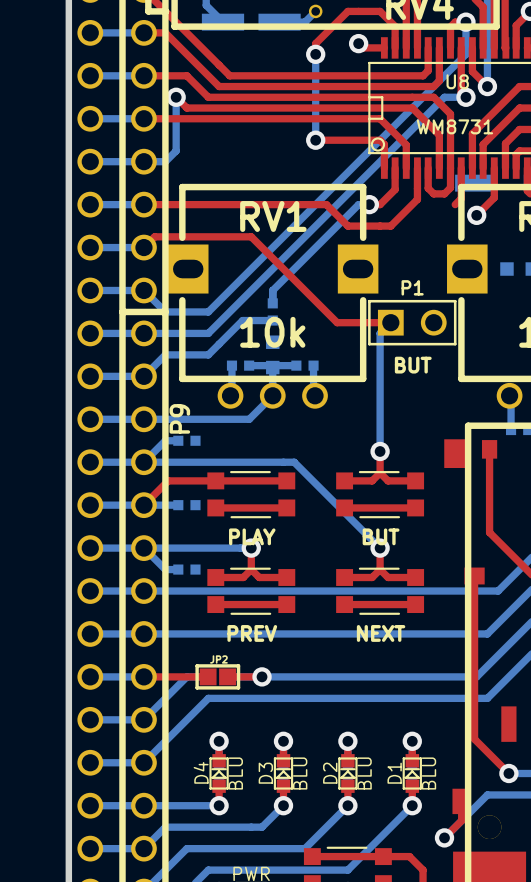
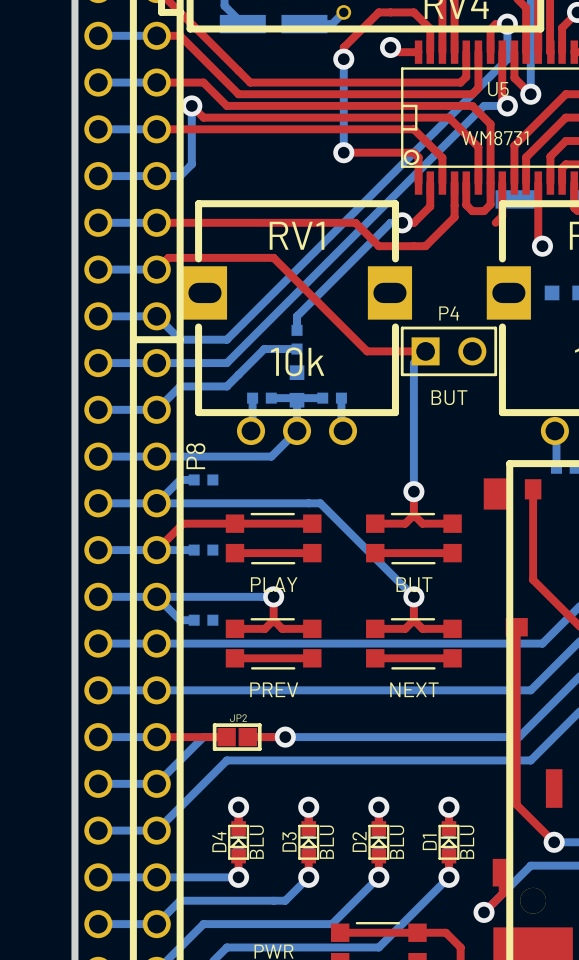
U8 name: U8 (457, 81) -> U5 (498, 89)
top track: (494, 197) (476, 215) -> (538, 215) (538, 241) (542, 246)
via position: (476, 215) -> (542, 246)
P1 name: P1 (412, 287) -> P4 (449, 313)
P9 name: P9 (179, 418) -> P8 (195, 456)

